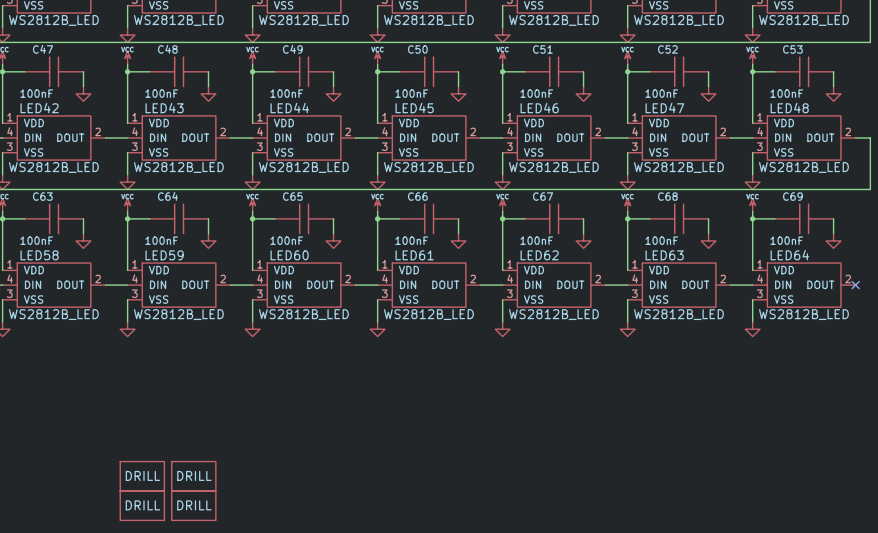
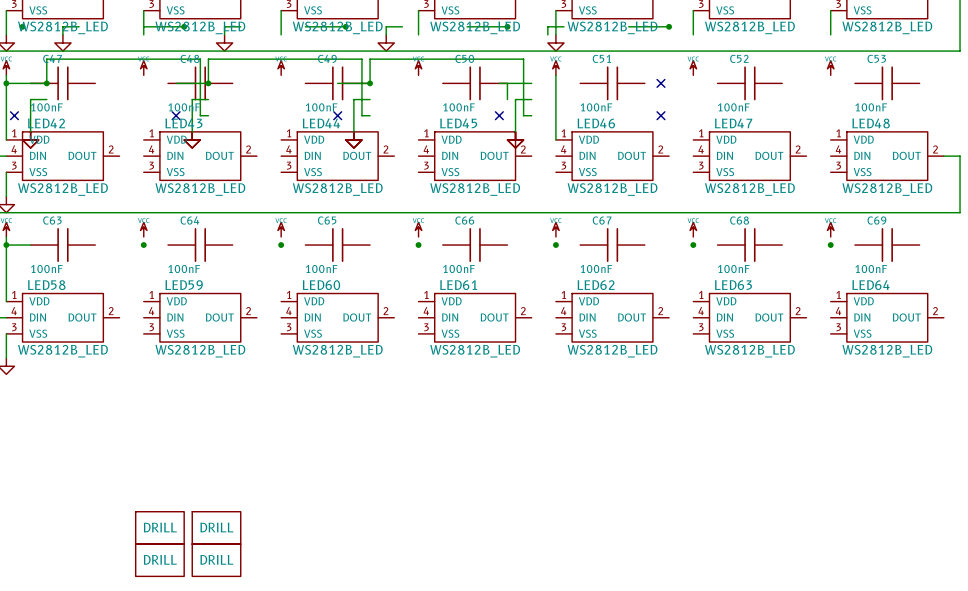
junction: none -> (22, 26)
wire: none -> (79, 26) (62, 26) (62, 34)
wire: none -> (143, 26) (184, 26)
junction: none -> (184, 26)
wire: none -> (240, 26) (224, 26) (224, 34)
wire: none -> (305, 26) (345, 26)
junction: none -> (345, 26)
wire: none -> (402, 26) (386, 26) (386, 34)
wire: none -> (467, 26) (507, 26)
junction: none -> (507, 26)
wire: none -> (564, 26) (547, 26) (547, 34)
wire: none -> (628, 26) (669, 26)
junction: none -> (669, 26)
power symbol: none -> (62, 42)
power symbol: (127, 35) -> none
power symbol: none -> (224, 42)
power symbol: (252, 35) -> none
power symbol position: (377, 35) -> (386, 42)
power symbol: (627, 35) -> none
power symbol: (752, 35) -> none
wire: (127, 64) (127, 123) -> none
wire: (252, 64) (252, 123) -> none
wire: (377, 64) (377, 123) -> none
wire: (627, 64) (627, 123) -> none
wire: (752, 64) (752, 123) -> none
wire: none -> (30, 83) (46, 83) (46, 59) (200, 59) (200, 115) (208, 115)
junction: none -> (46, 83)
wire: (83, 71) (83, 86) -> none
wire: (127, 71) (149, 71) -> none
junction: (127, 71) -> none
wire: none -> (176, 83) (208, 83) (208, 59) (361, 59) (361, 115) (370, 115)
junction: none -> (208, 83)
wire: (208, 71) (208, 86) -> none
wire: (252, 71) (274, 71) -> none
junction: (252, 71) -> none
wire: none -> (337, 83) (370, 83) (370, 59) (523, 59) (523, 115) (531, 115)
wire: (333, 71) (333, 86) -> (353, 131) (353, 99) (370, 99)
junction: none -> (370, 83)
wire: (377, 71) (399, 71) -> none
junction: (377, 71) -> none
wire: none -> (499, 83) (531, 83)
wire: (502, 71) (524, 71) -> none
junction: (502, 71) -> none
wire: (583, 71) (583, 86) -> none
no-connect mark: none -> (660, 83)
wire: (627, 71) (649, 71) -> none
junction: (627, 71) -> none
wire: (708, 71) (708, 86) -> none
wire: (752, 71) (774, 71) -> none
junction: (752, 71) -> none
wire: (833, 71) (833, 86) -> none
wire: none -> (46, 99) (30, 99) (30, 131)
wire: none -> (208, 99) (192, 99) (192, 131)
wire: none -> (531, 99) (515, 99) (515, 131)
power symbol: (83, 93) -> none
power symbol: (208, 93) -> none
power symbol: (333, 93) -> none
power symbol position: (458, 93) -> (515, 139)
power symbol: (583, 93) -> none
power symbol: (708, 93) -> none
power symbol: (833, 93) -> none
no-connect mark: none -> (14, 115)
no-connect mark: none -> (176, 115)
no-connect mark: none -> (337, 115)
no-connect mark: none -> (499, 115)
no-connect mark: none -> (660, 115)
power symbol: none -> (30, 139)
power symbol: none -> (192, 139)
power symbol: none -> (353, 139)
wire: (105, 138) (127, 138) -> none
wire: (230, 138) (252, 138) -> none
wire: (355, 138) (377, 138) -> none
wire: (480, 138) (502, 138) -> none
wire: (605, 138) (627, 138) -> none
wire: (730, 138) (752, 138) -> none
wire: (127, 152) (127, 174) -> none
wire: (252, 152) (252, 174) -> none
wire: (377, 152) (377, 174) -> none
wire: (502, 152) (502, 174) -> none
wire: (627, 152) (627, 174) -> none
wire: (752, 152) (752, 174) -> none
power symbol: (127, 182) -> none
power symbol: (252, 182) -> none
power symbol: (377, 182) -> none
power symbol: (502, 182) -> none
power symbol: (627, 182) -> none
power symbol: (752, 182) -> none
wire: (127, 211) (127, 270) -> none
wire: (252, 211) (252, 270) -> none
wire: (377, 211) (377, 270) -> none
wire: (502, 211) (502, 270) -> none
wire: (627, 211) (627, 270) -> none
wire: (752, 211) (752, 270) -> none
wire: (83, 218) (83, 233) -> none
wire: (127, 218) (149, 218) -> none
wire: (208, 218) (208, 233) -> none
wire: (252, 218) (274, 218) -> none
wire: (333, 218) (333, 233) -> none
wire: (377, 218) (399, 218) -> none
wire: (458, 218) (458, 233) -> none
wire: (502, 218) (524, 218) -> none
wire: (583, 218) (583, 233) -> none
wire: (627, 218) (649, 218) -> none
wire: (708, 218) (708, 233) -> none
wire: (752, 218) (774, 218) -> none
wire: (833, 218) (833, 233) -> none
power symbol: (83, 240) -> none
power symbol: (208, 240) -> none
power symbol: (333, 240) -> none
power symbol: (458, 240) -> none
power symbol: (583, 240) -> none
power symbol: (708, 240) -> none
power symbol: (833, 240) -> none
wire: (105, 285) (127, 285) -> none
wire: (230, 285) (252, 285) -> none
wire: (355, 285) (377, 285) -> none
wire: (480, 285) (502, 285) -> none
wire: (605, 285) (627, 285) -> none
wire: (730, 285) (752, 285) -> none
no-connect mark: (855, 285) -> none
wire: (127, 299) (127, 321) -> none
wire: (252, 299) (252, 321) -> none
wire: (377, 299) (377, 321) -> none
wire: (502, 299) (502, 321) -> none
wire: (627, 299) (627, 321) -> none
wire: (752, 299) (752, 321) -> none
power symbol: (127, 329) -> none
power symbol: (252, 329) -> none
power symbol: (377, 329) -> none
power symbol: (502, 329) -> none
power symbol: (627, 329) -> none
power symbol: (752, 329) -> none

